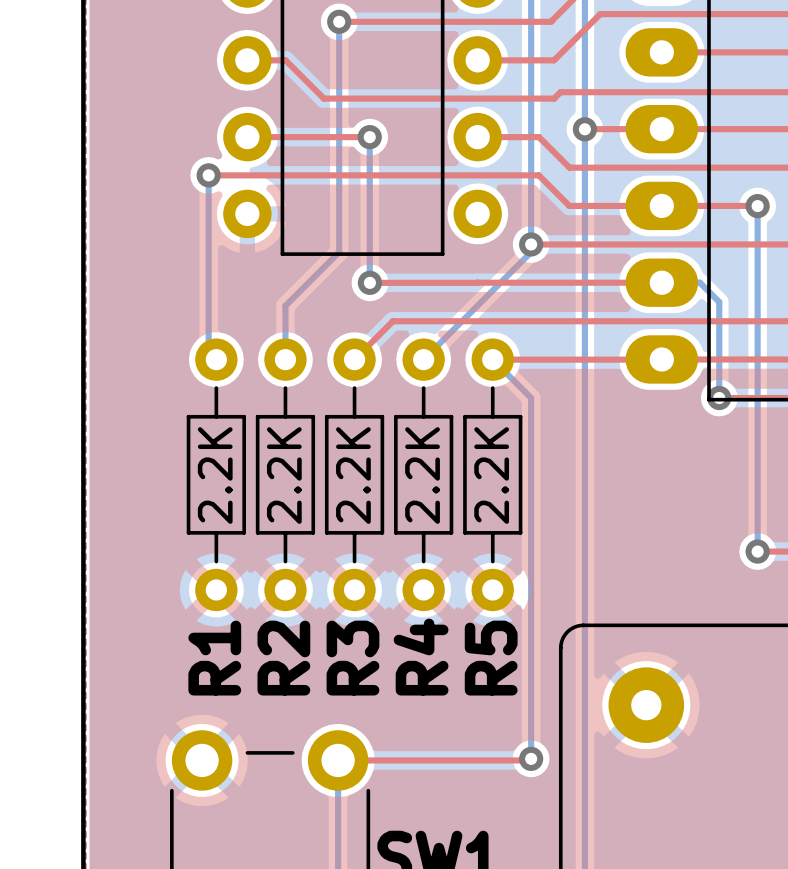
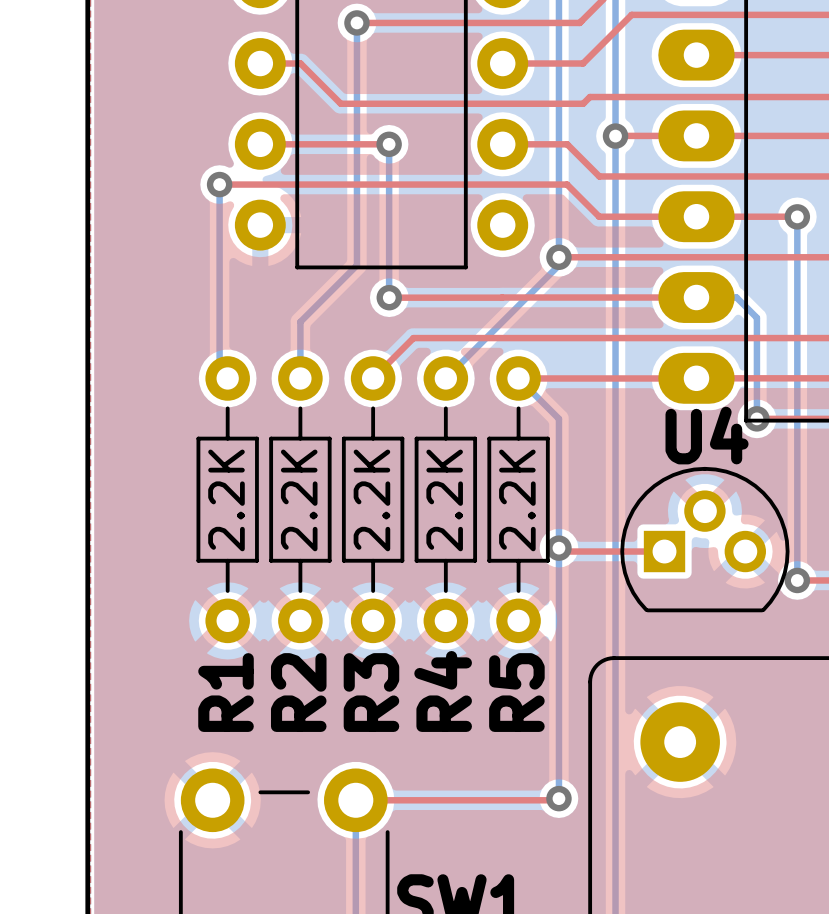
U4: none -> (704, 539)
top track: none -> (558, 548) (562, 551) (664, 551)
via: none -> (558, 548)

